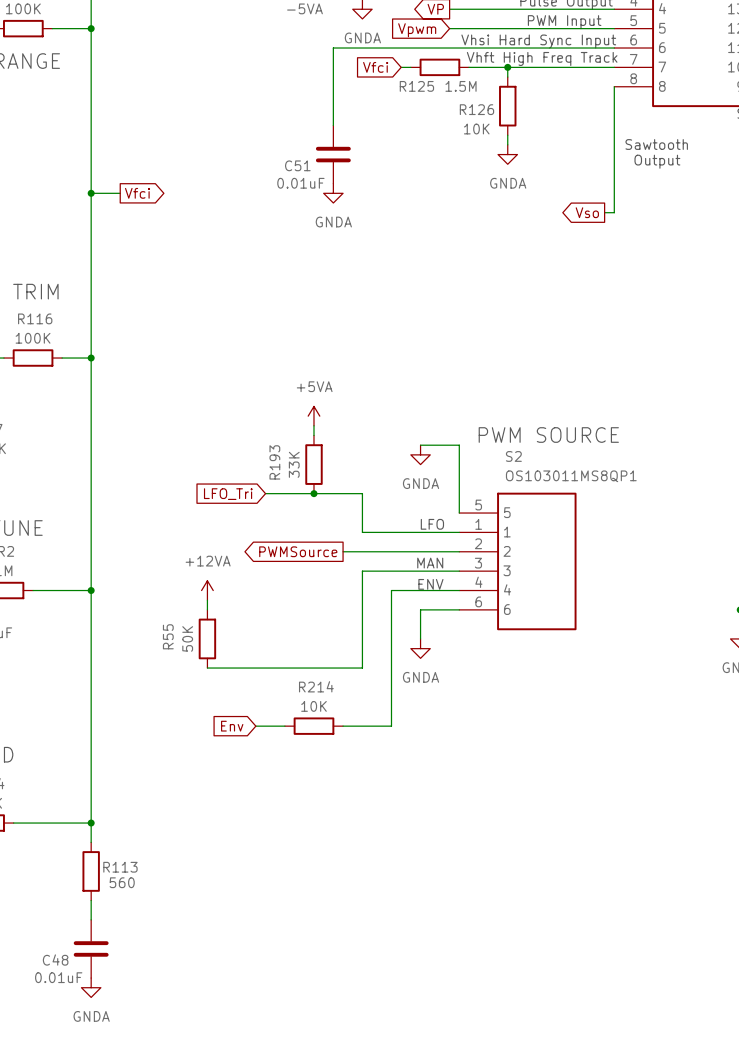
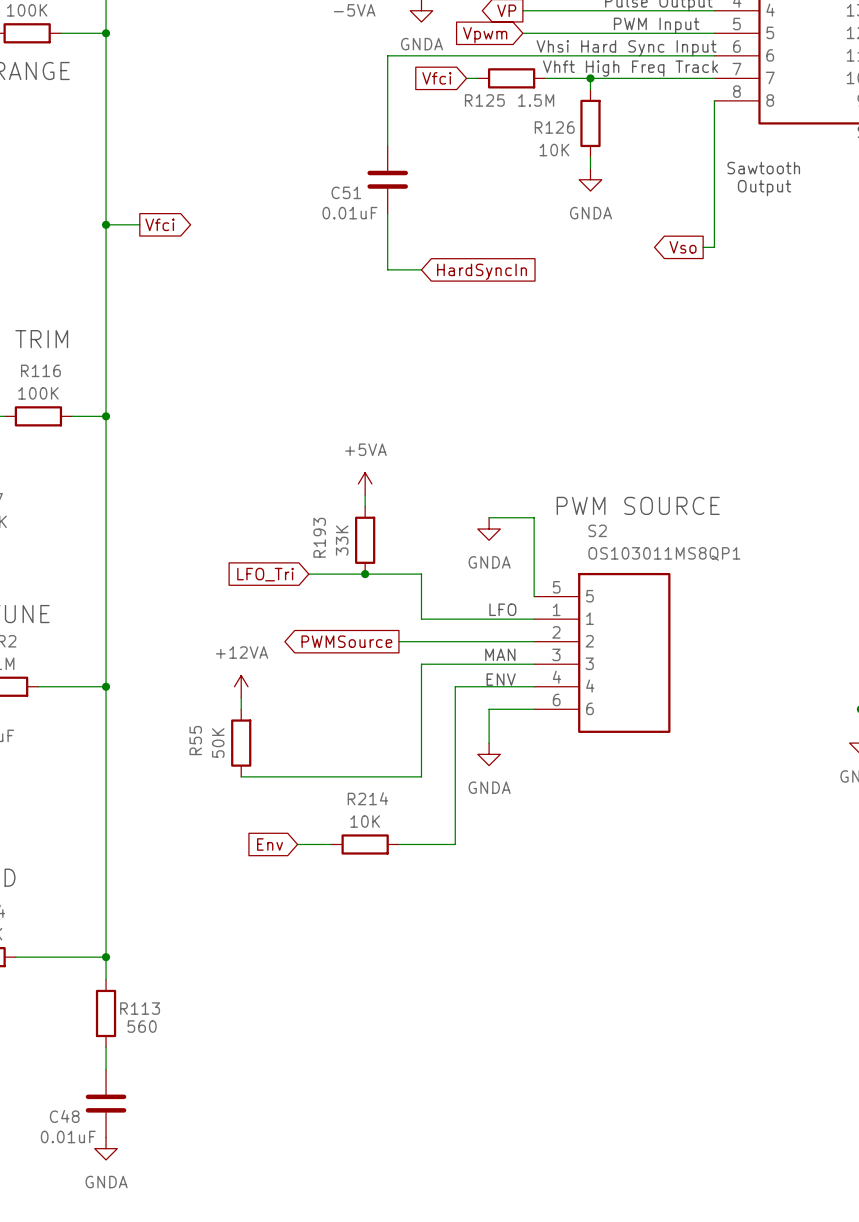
wire: none -> (387, 213) (387, 269) (421, 269)
power symbol: GNDA (333, 193) -> none
global label: none -> HardSyncIn (481, 271)

